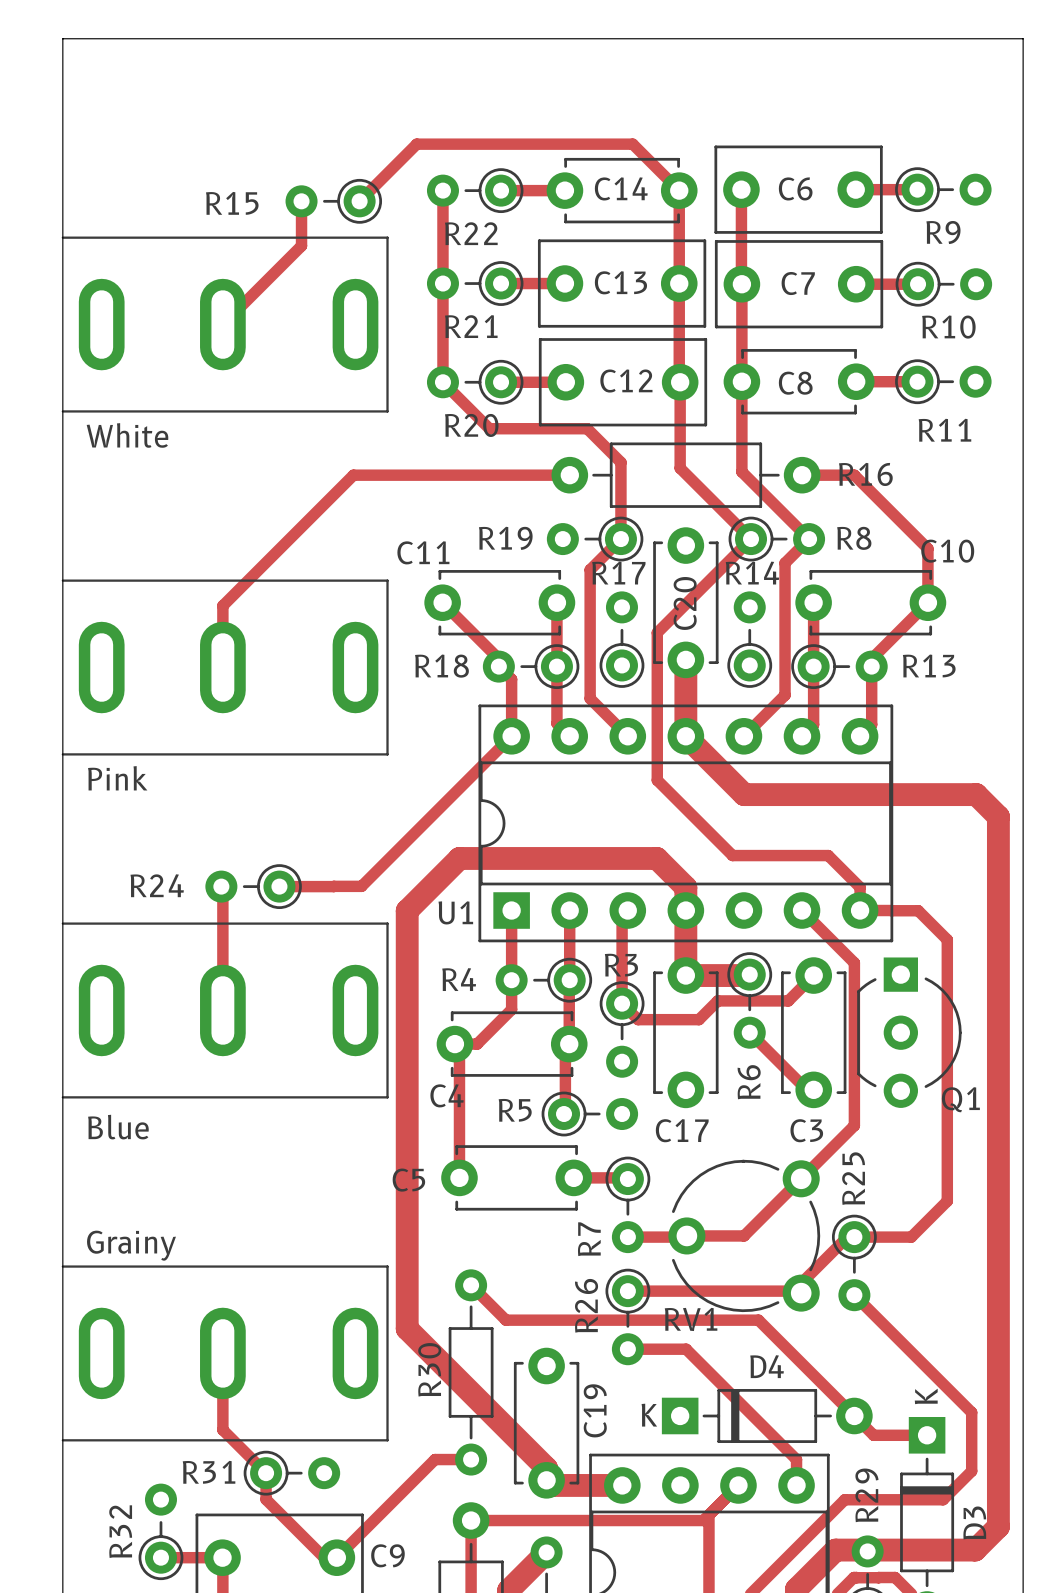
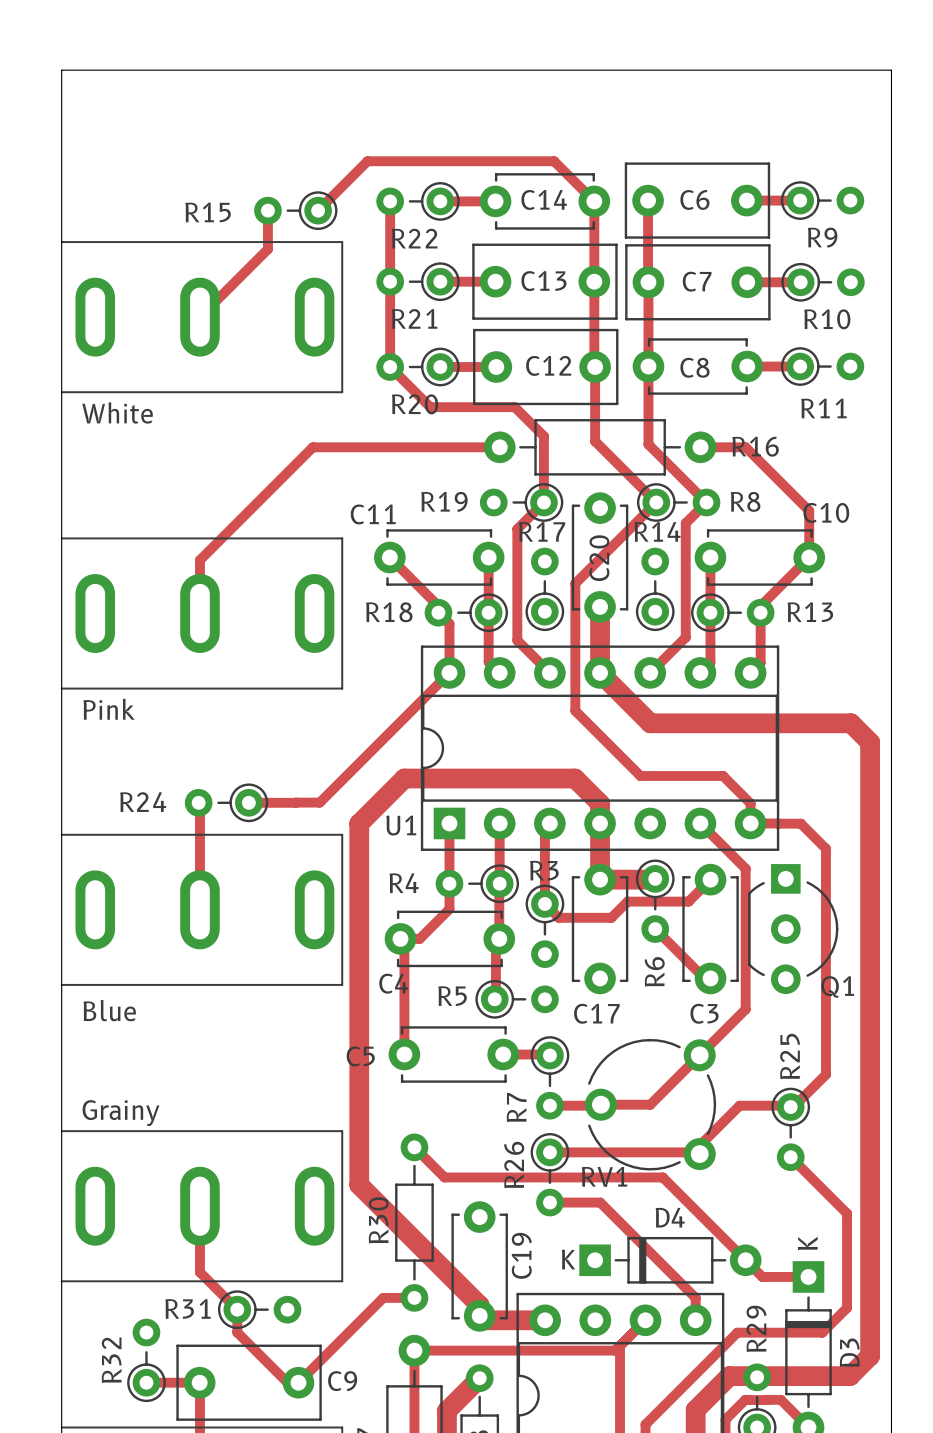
R25 position: (854, 1262) -> (790, 1129)
track: (854, 1295) (971, 1412) -> (789, 1155) (847, 1213) (847, 1257)

